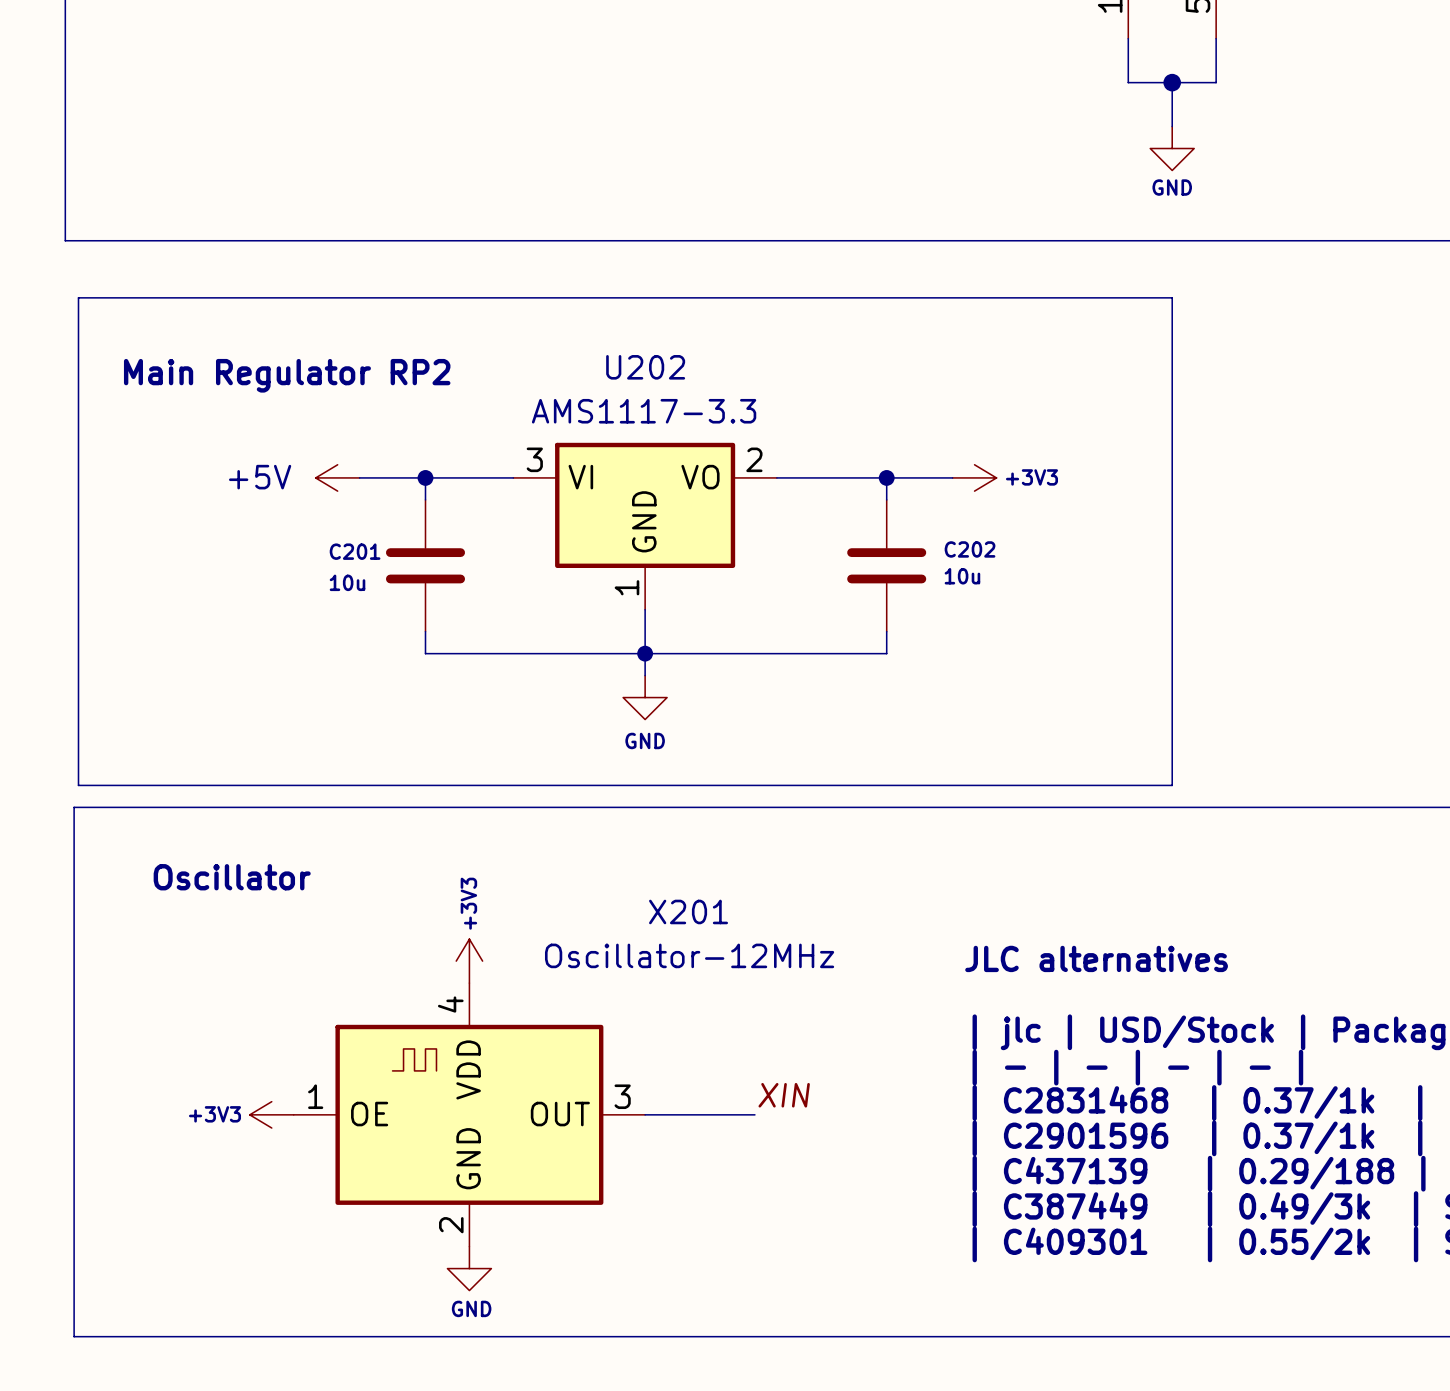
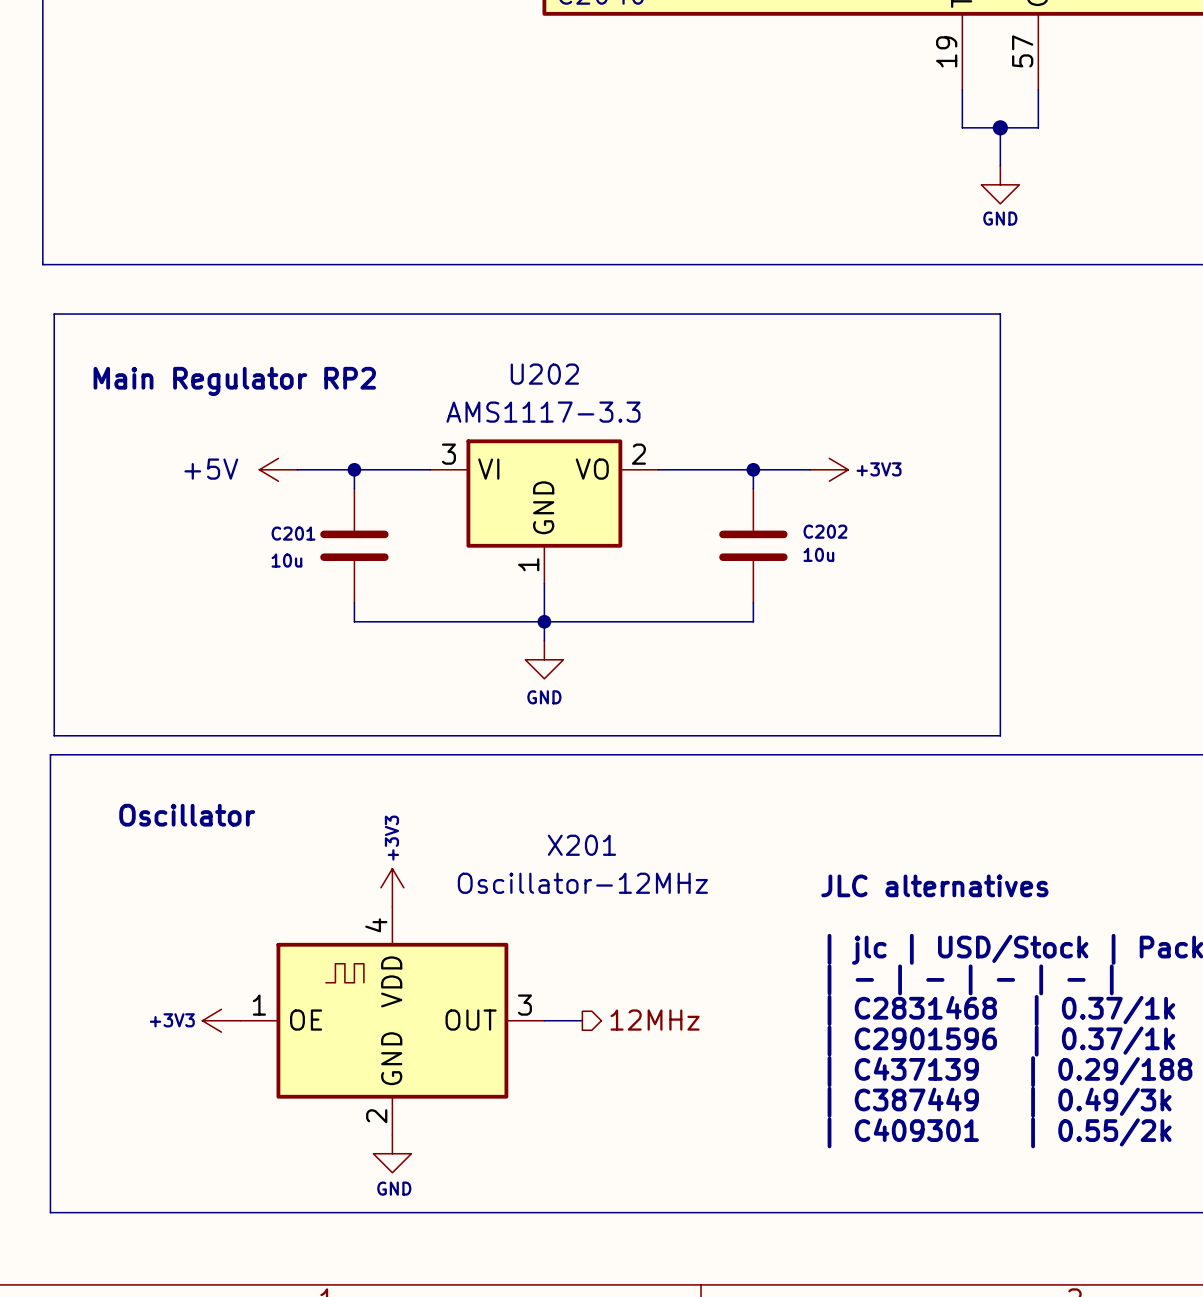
label: XIN (784, 1095) -> none
wire: (689, 1114) (754, 1114) -> none
hierarchical label: none -> 12MHz (655, 1020)

